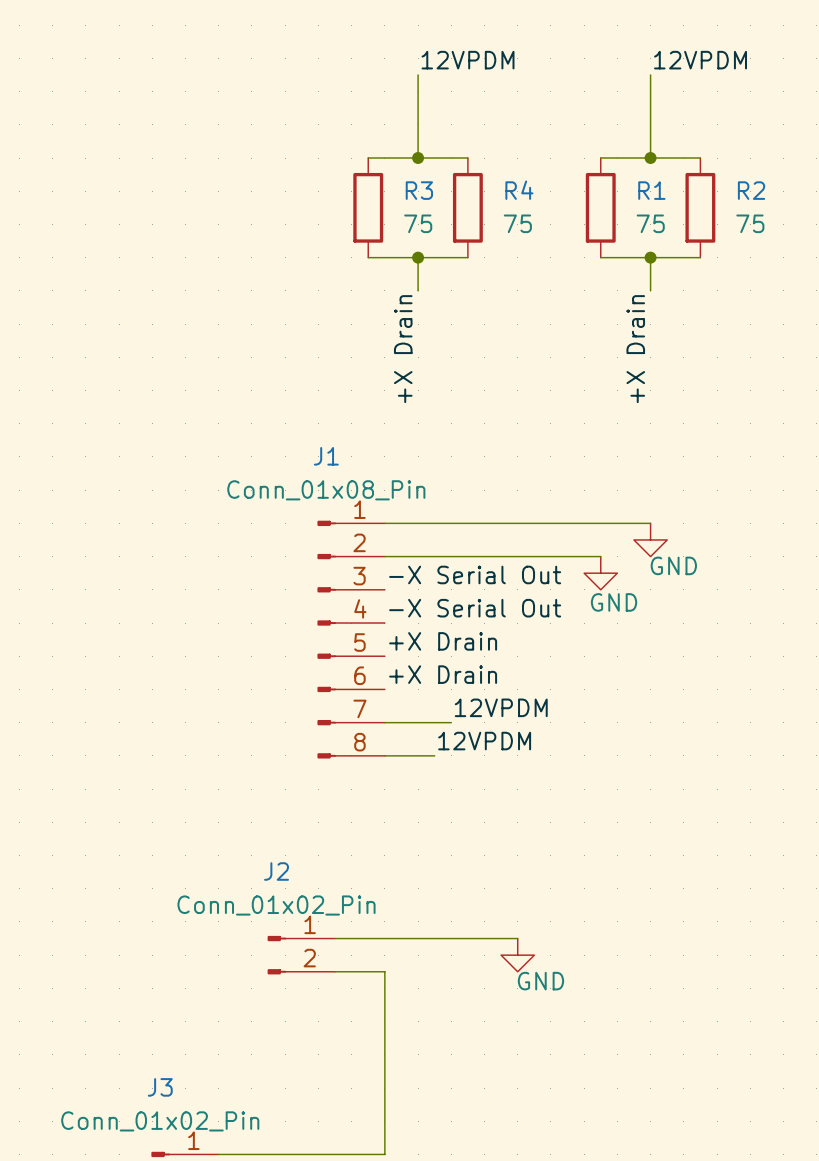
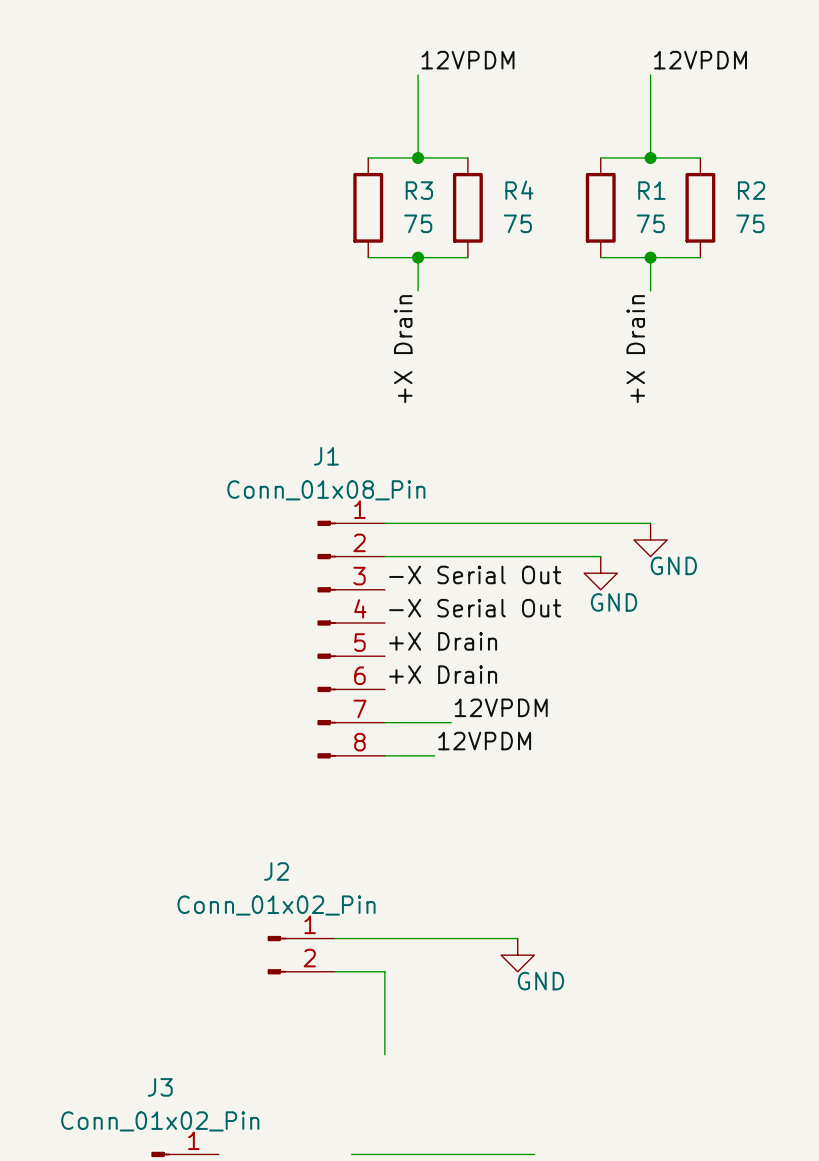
wire: (384, 1054) (384, 1154) -> (534, 1154) (384, 1154)
wire: (218, 1154) (351, 1154) -> none

